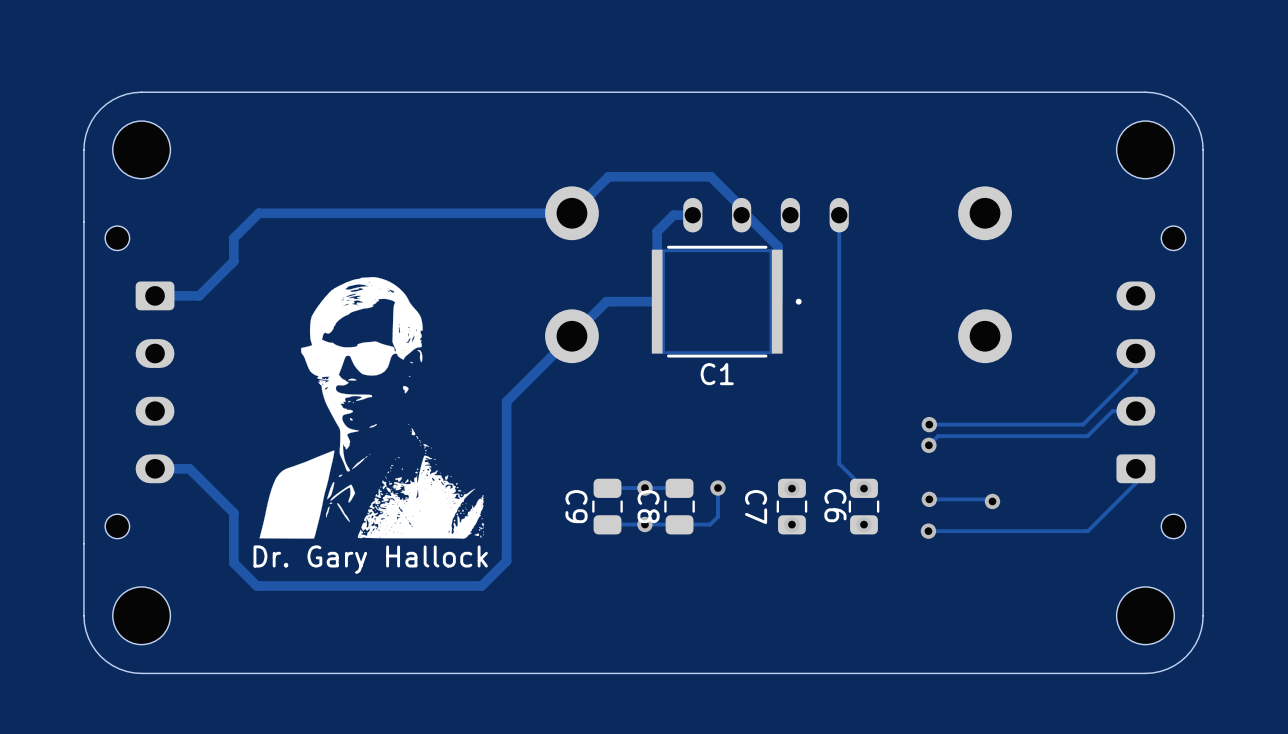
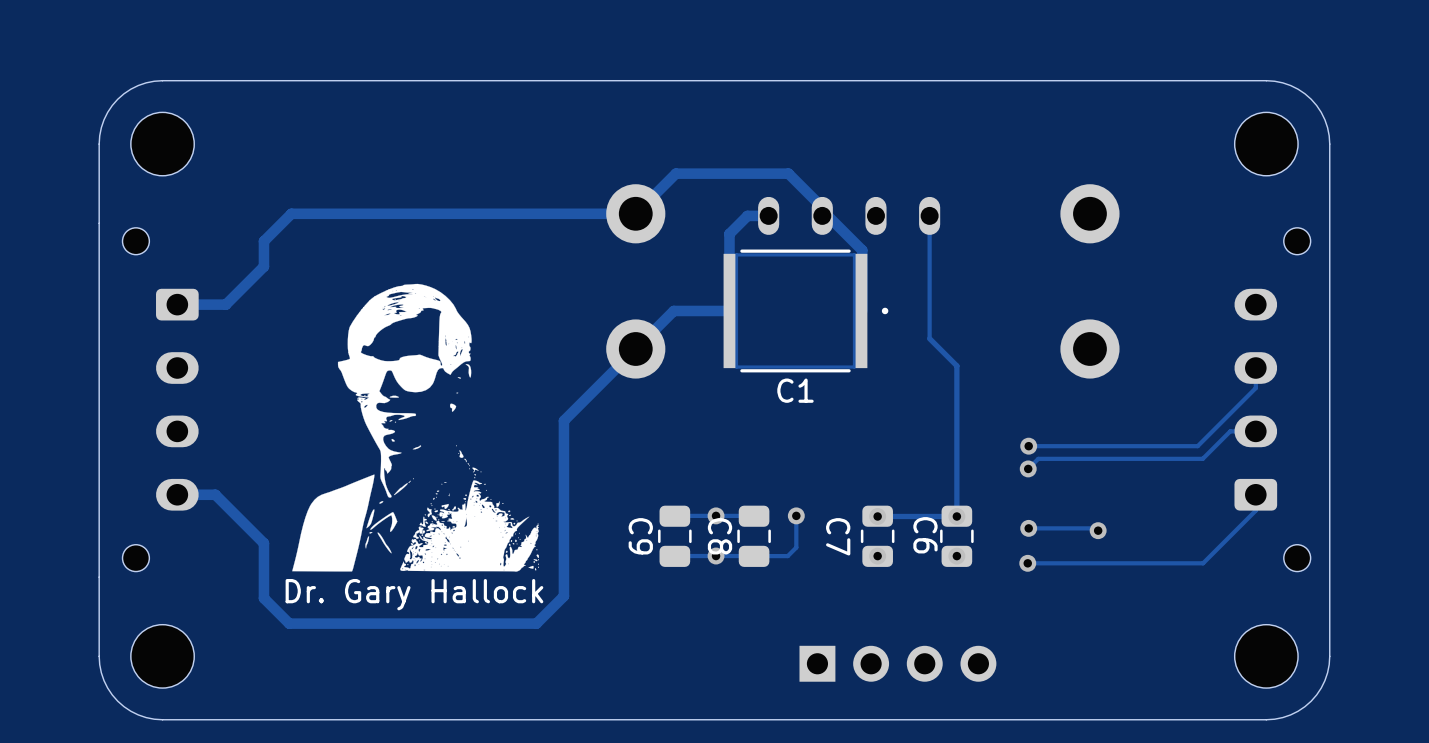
track: (839, 326) (839, 463) (863, 488) -> (929, 338) (956, 365) (956, 516) (877, 516)
part: none -> (897, 663)

